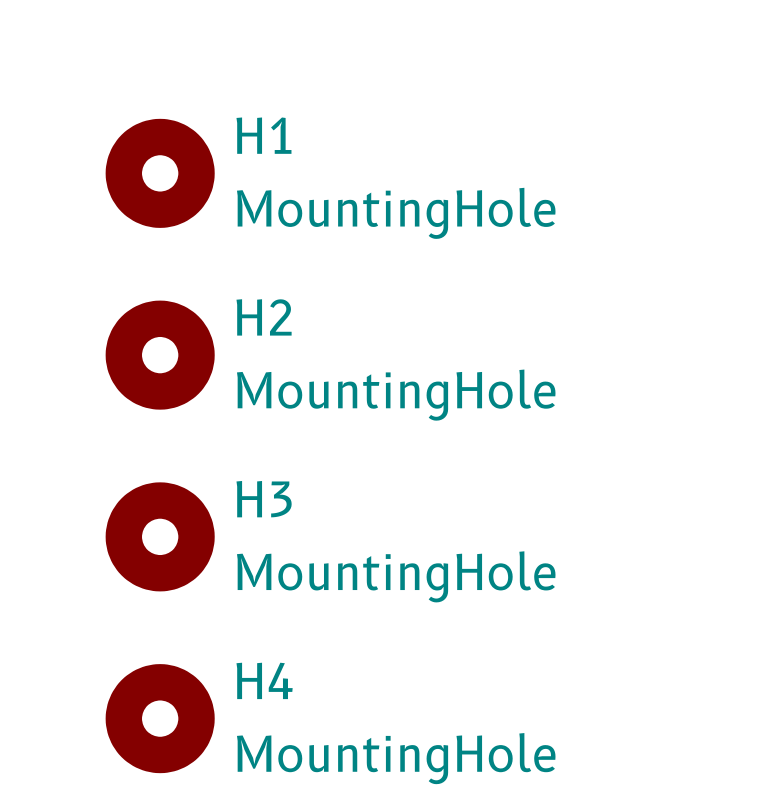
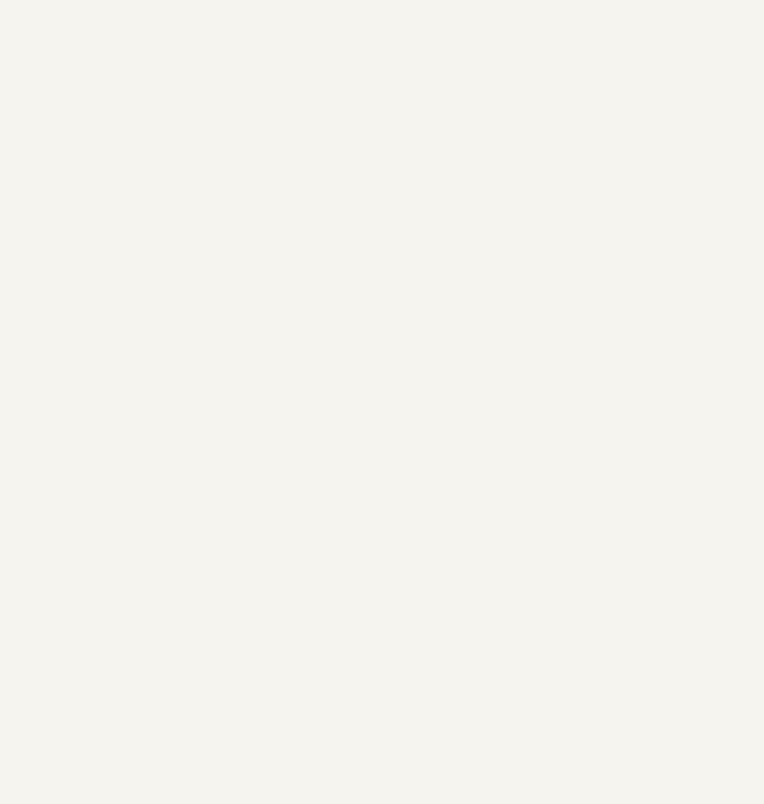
H1: MountingHole (160, 173) -> none
H2: MountingHole (160, 355) -> none
H3: MountingHole (160, 536) -> none
H4: MountingHole (160, 718) -> none

